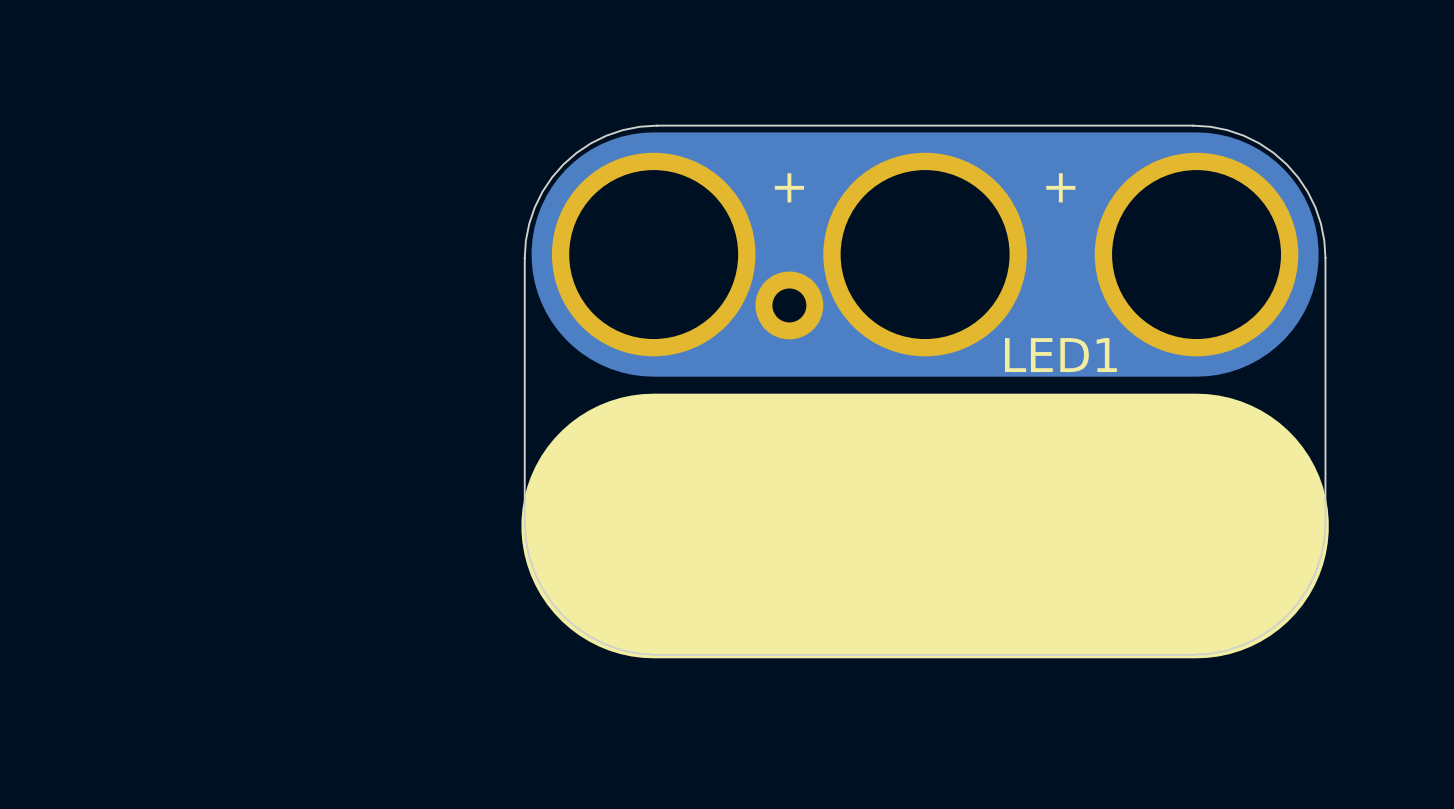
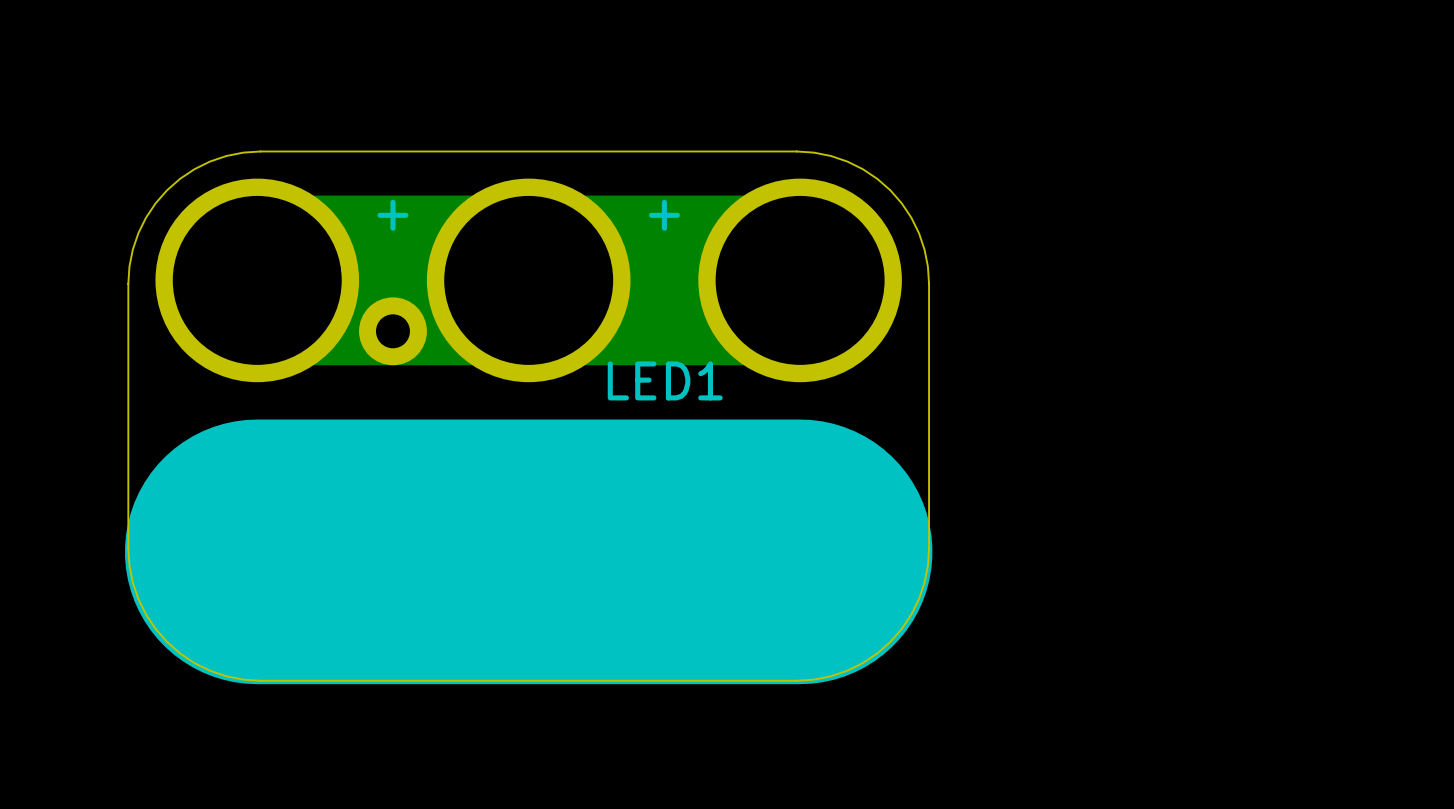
LED1 footprint: [521, 124, 1329, 659] -> [124, 150, 933, 685]

